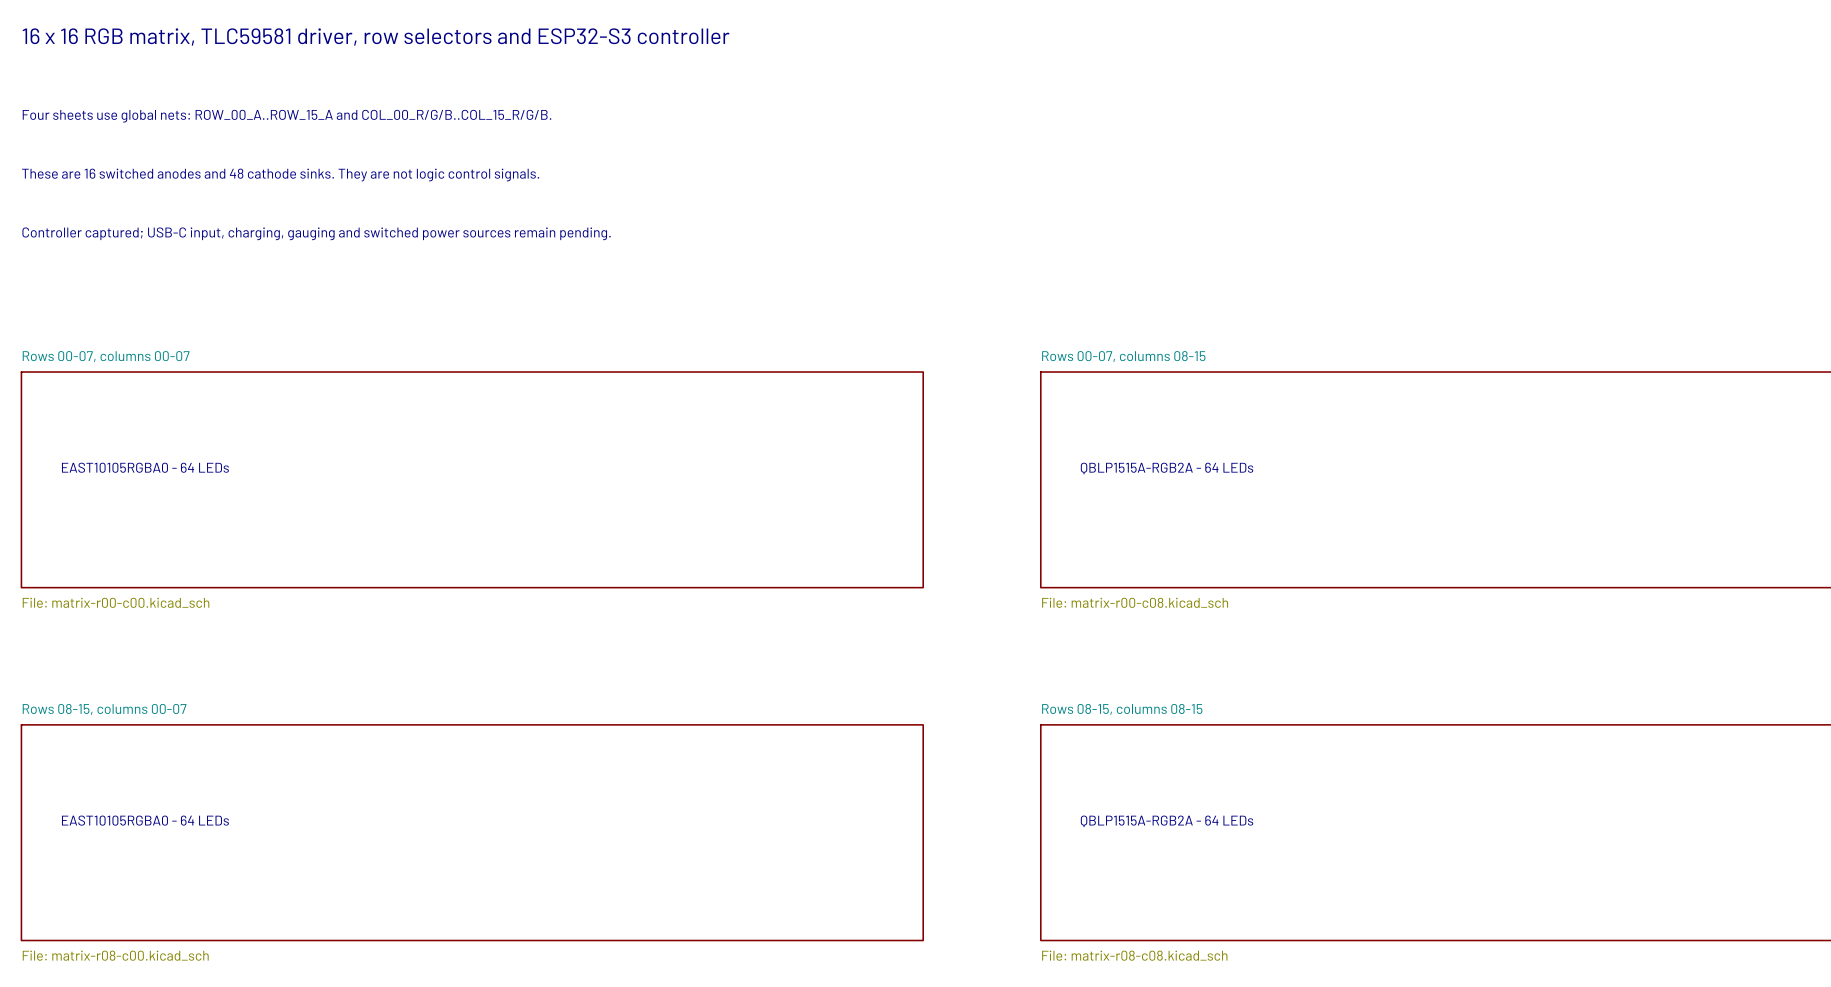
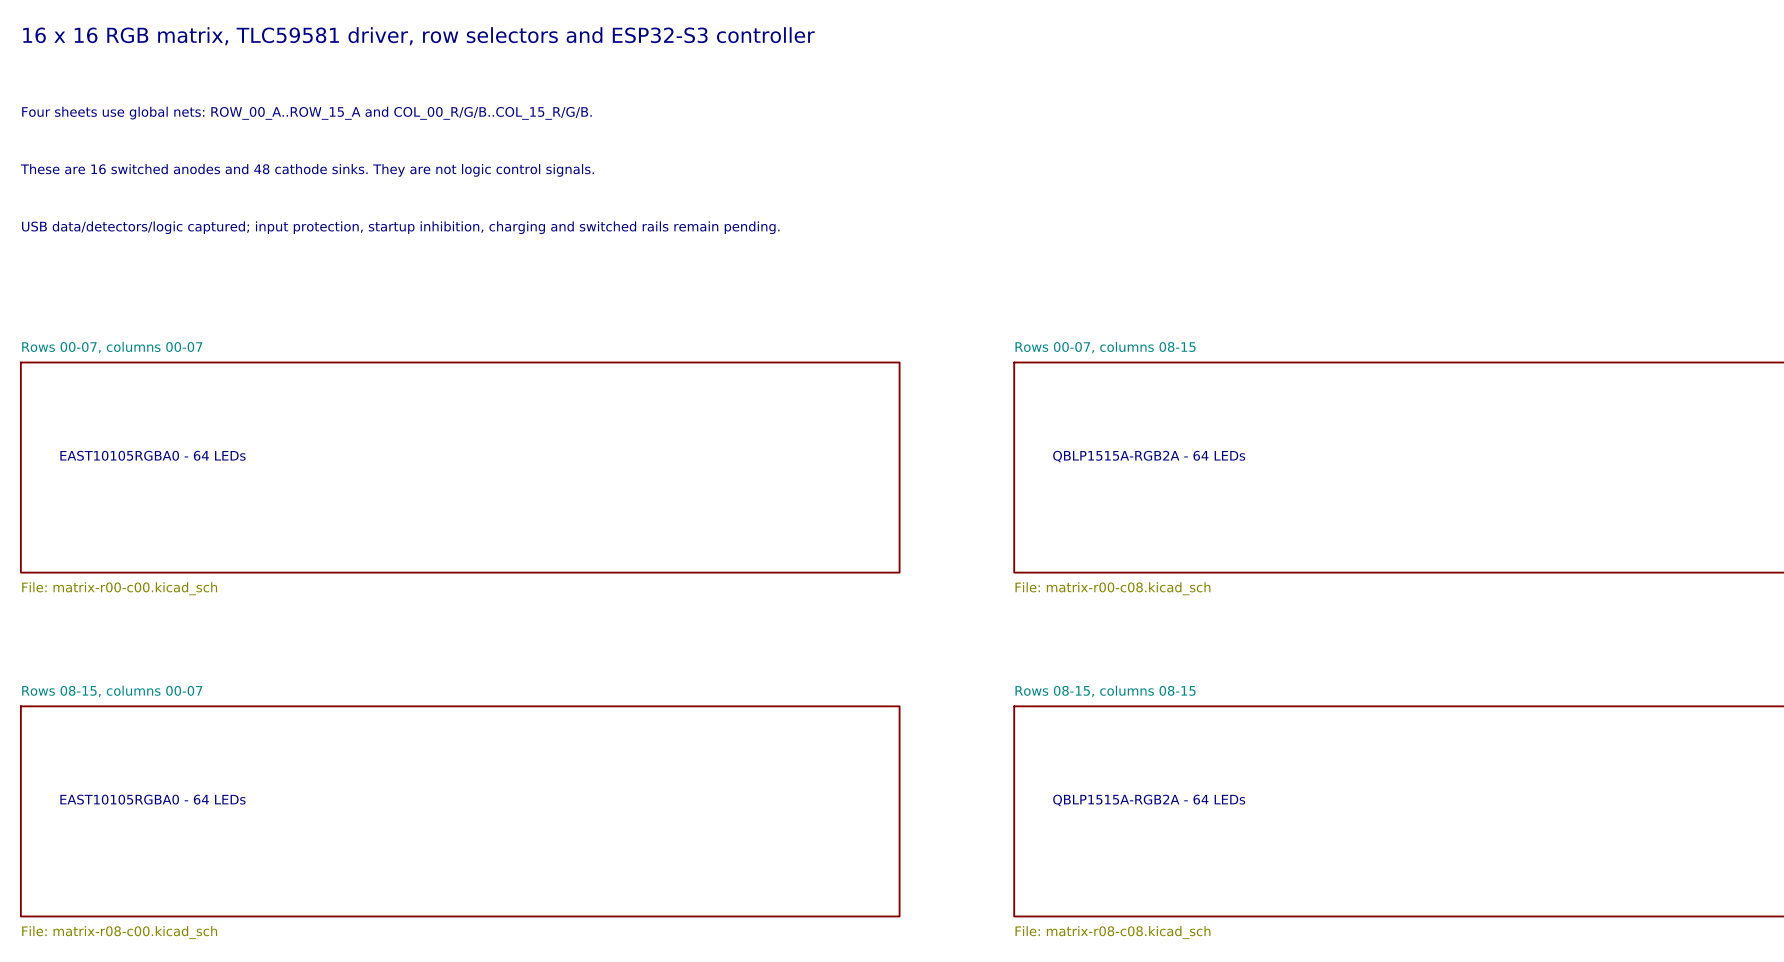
text: Controller captured; USB-C input, charging, gauging and switched power sources remain pending. (316, 233) -> USB data/detectors/logic captured; input protection, startup inhibition, charging and switched rails remain pending. (400, 227)

